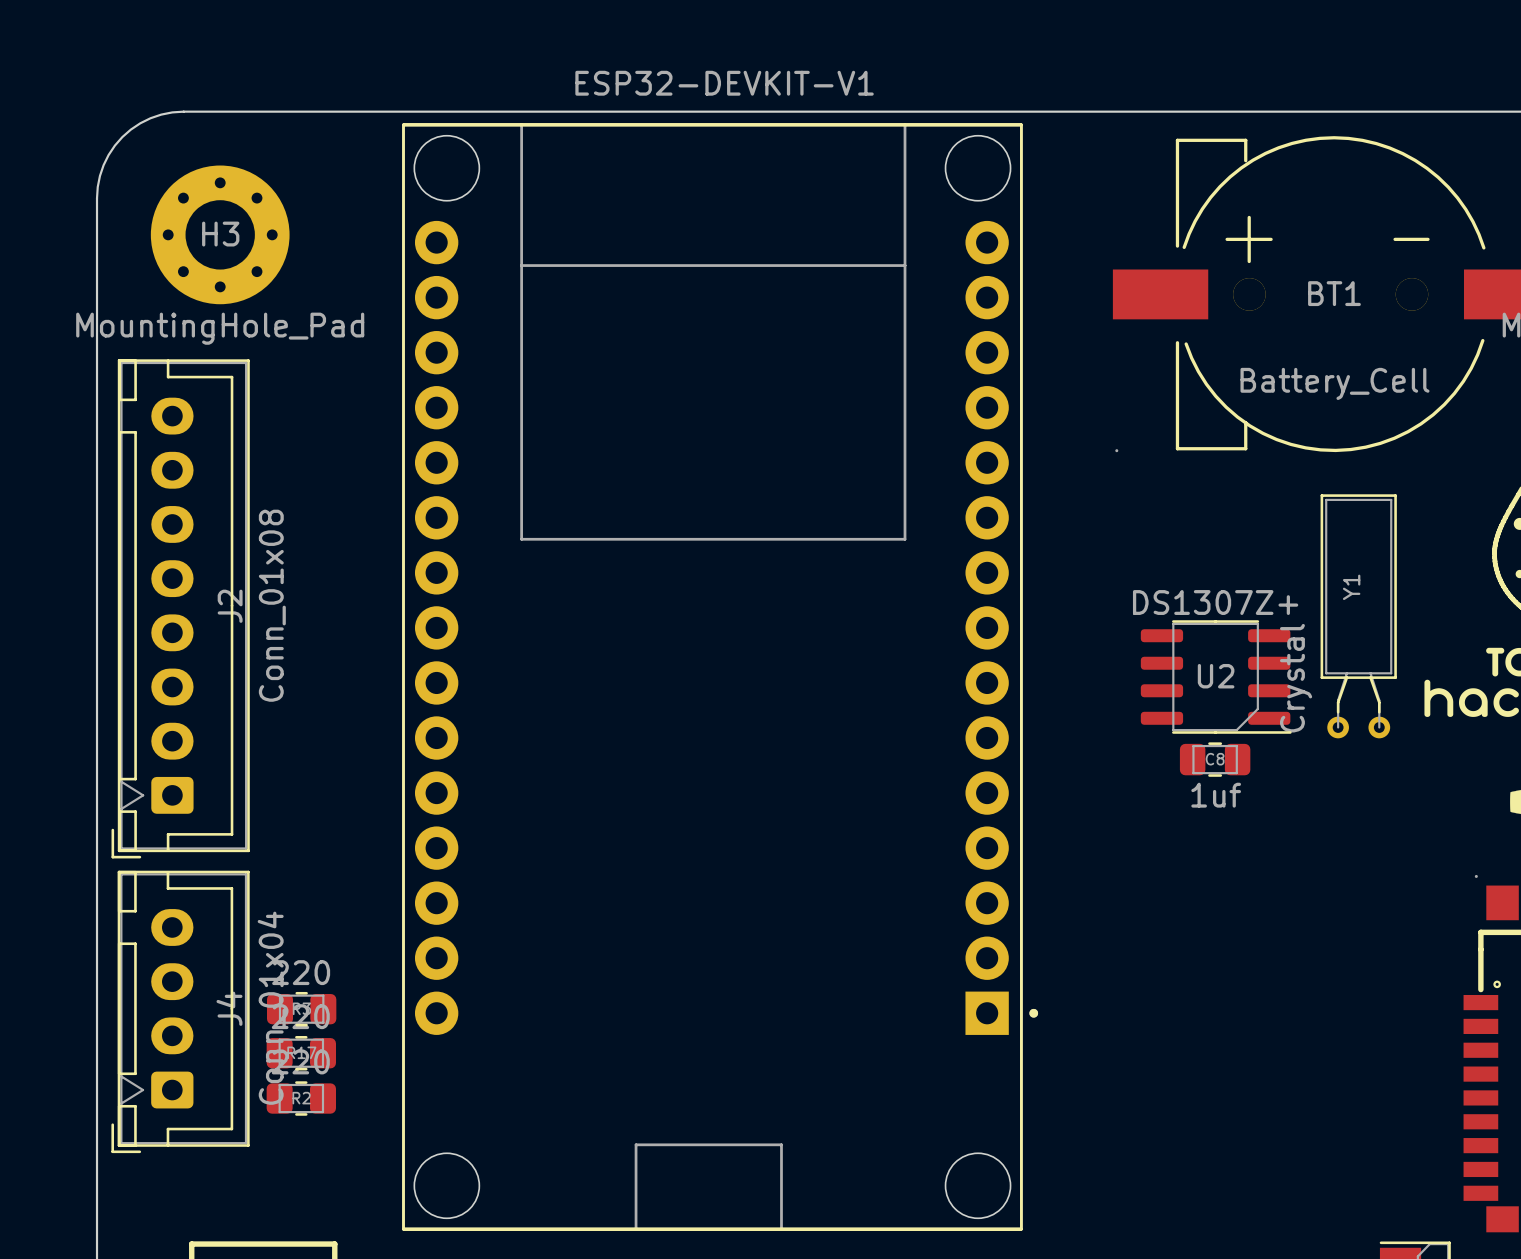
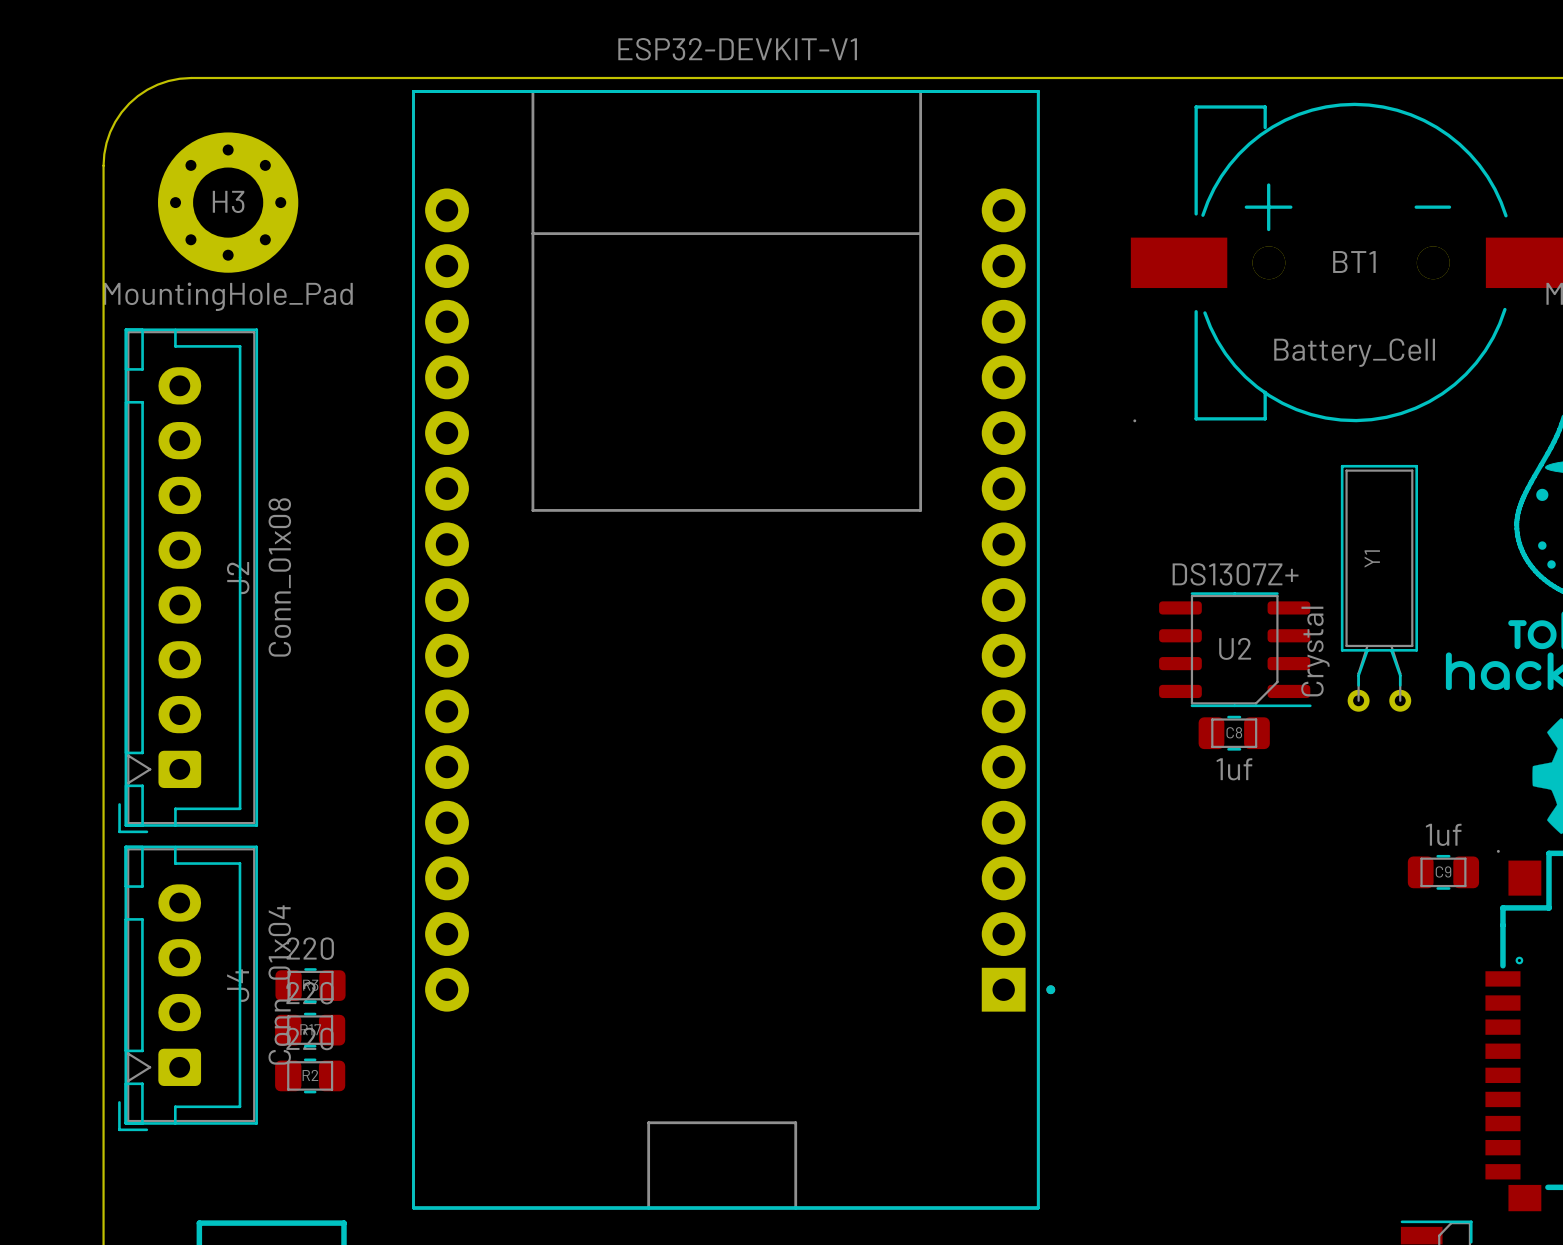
part footprint: [402, 123, 1039, 1231] -> [412, 90, 1056, 1210]
C9: none -> 1uf (1443, 872)

